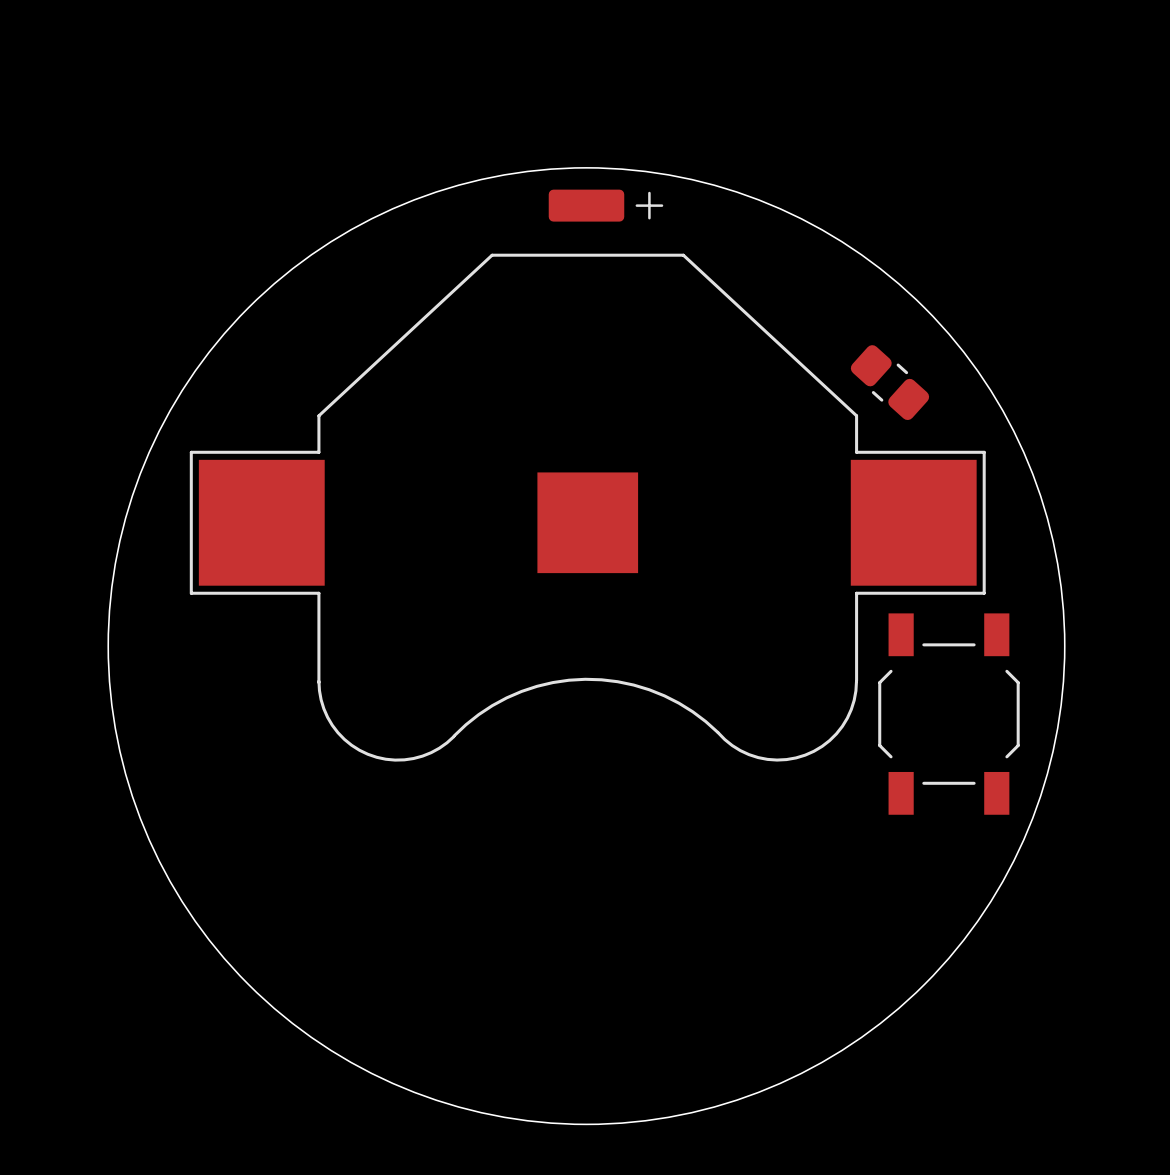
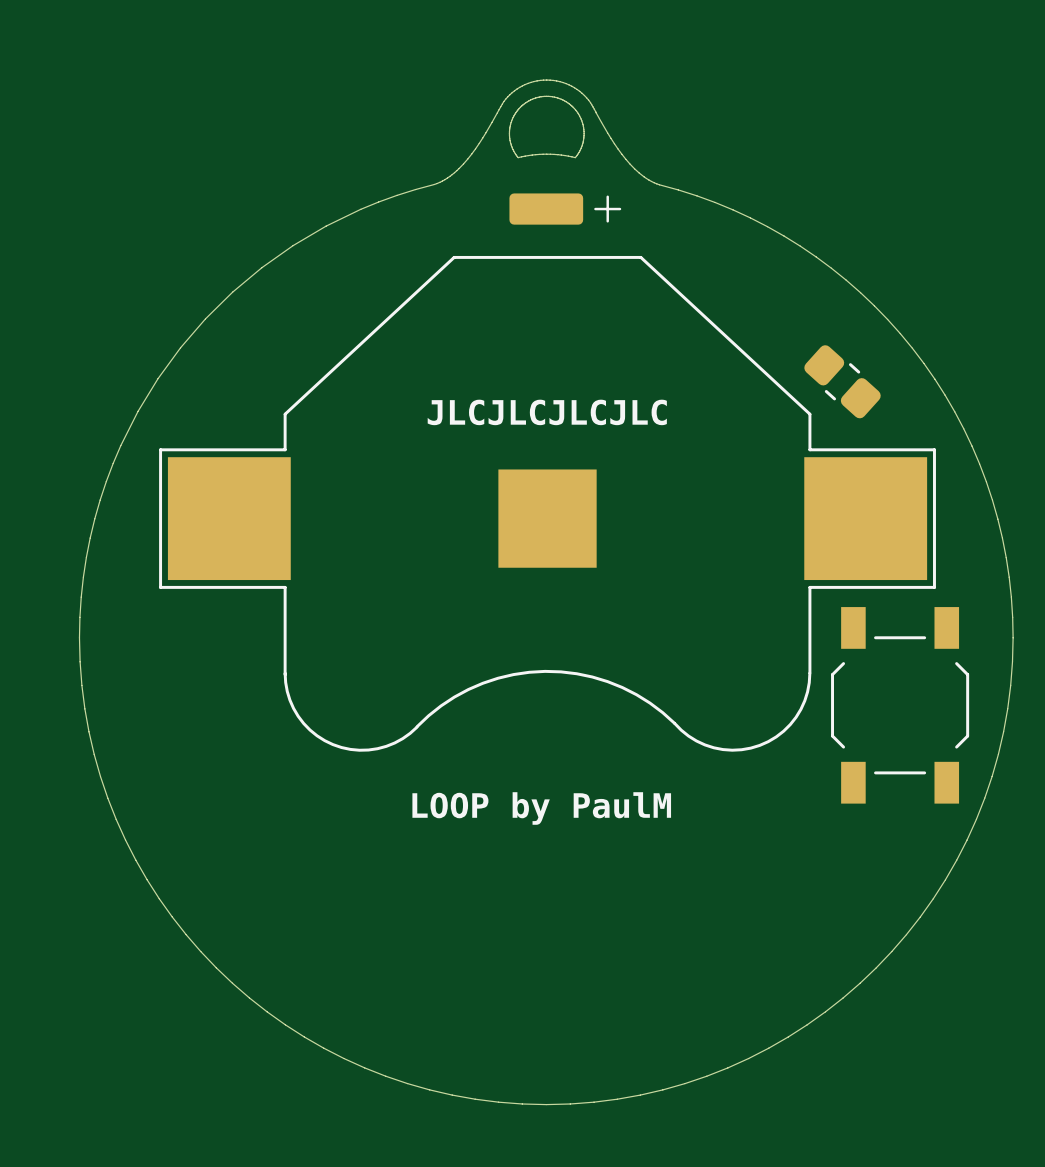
board edge: none -> (543, 80) (525, 84) (507, 96) (475, 148) (463, 163) (449, 176) (437, 183) (396, 195) (360, 209) (326, 226) (293, 245) (261, 267) (232, 292) (205, 318) (180, 347) (158, 378) (138, 411) (120, 445) (106, 481) (94, 518) (86, 557) (81, 597) (79, 637) (81, 685) (88, 731) (100, 776) (116, 819) (135, 860) (159, 898) (186, 934) (216, 967) (249, 997) (285, 1024) (323, 1048) (364, 1067) (407, 1083) (452, 1095) (498, 1102) (546, 1104) (593, 1102) (640, 1095) (685, 1083) (727, 1067) (768, 1048) (807, 1024) (843, 997) (876, 967) (906, 934) (933, 898) (956, 860) (976, 819) (992, 776) (1003, 731) (1010, 685) (1013, 637) (1011, 597) (1006, 557) (997, 519) (986, 481) (971, 446) (954, 411) (934, 379) (900, 333) (874, 305) (846, 280) (816, 256) (784, 236) (732, 209) (696, 195) (656, 183) (643, 176) (621, 154) (584, 95) (565, 83) (543, 80)
board edge: none -> (544, 96) (527, 101) (514, 114) (509, 131) (513, 149) (518, 157) (546, 154) (575, 157) (583, 138) (583, 127) (580, 117) (574, 108) (566, 101) (556, 97) (544, 96)
round board edge: [107, 167, 1066, 1125] -> none
text: none -> JLCJLCJLCJLC (547, 412)
text: none -> LOOP by PaulM (541, 808)

